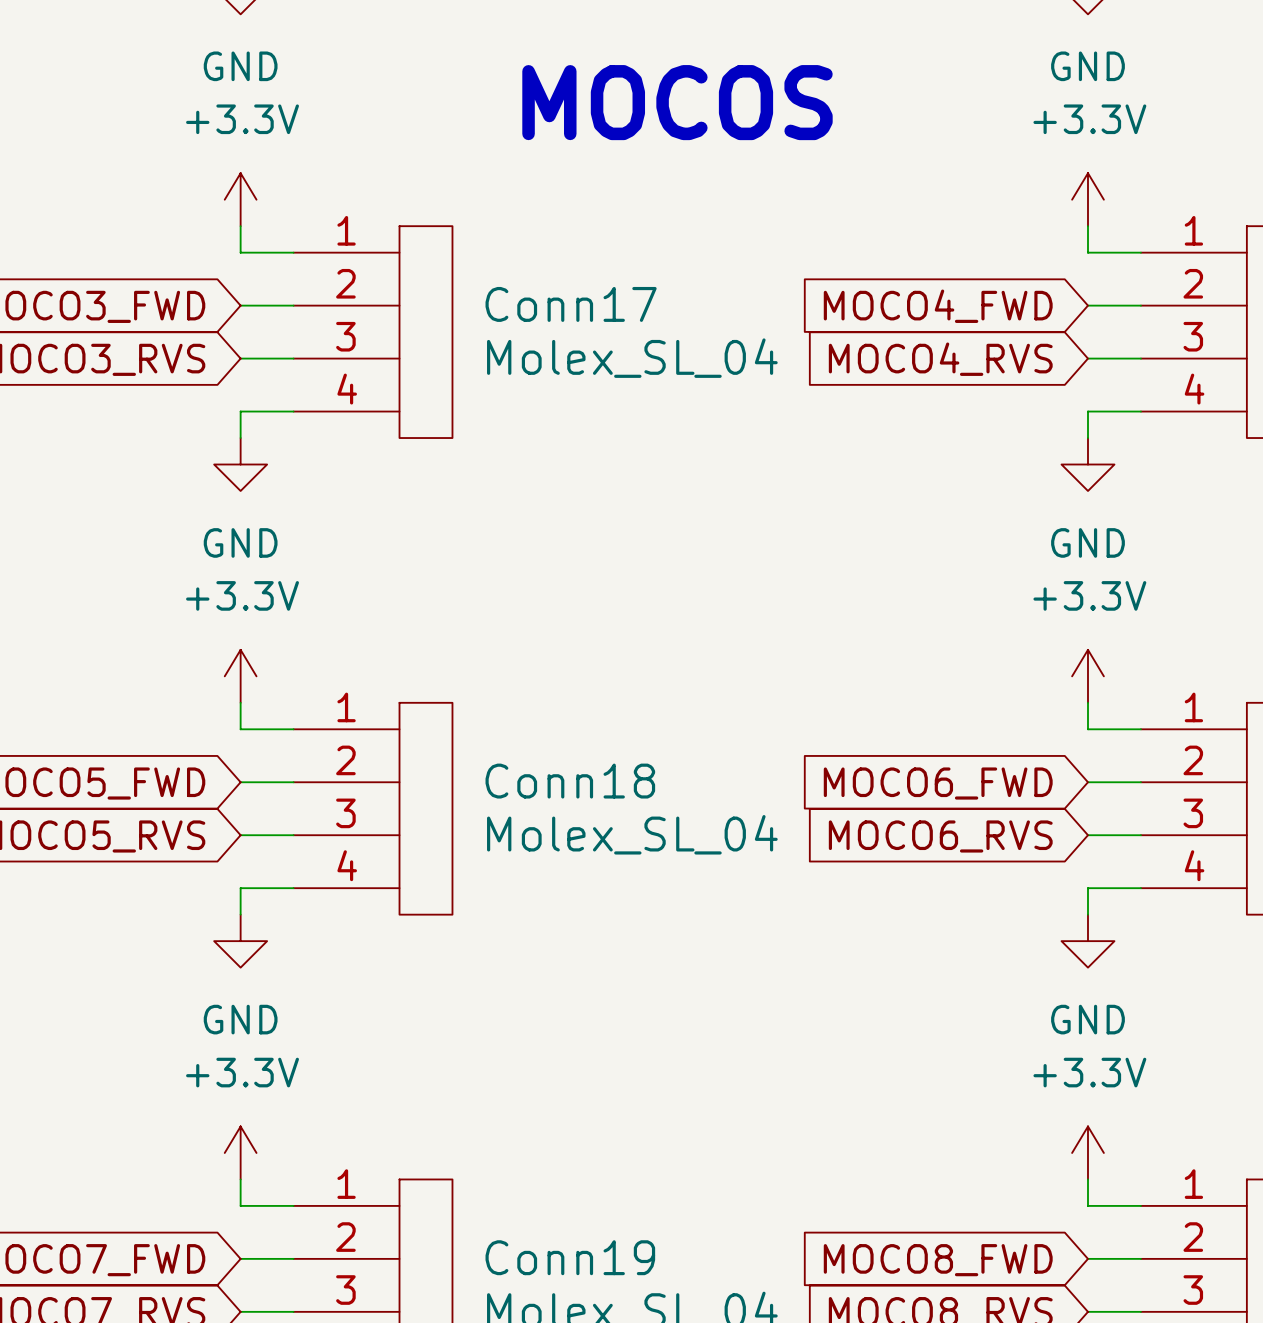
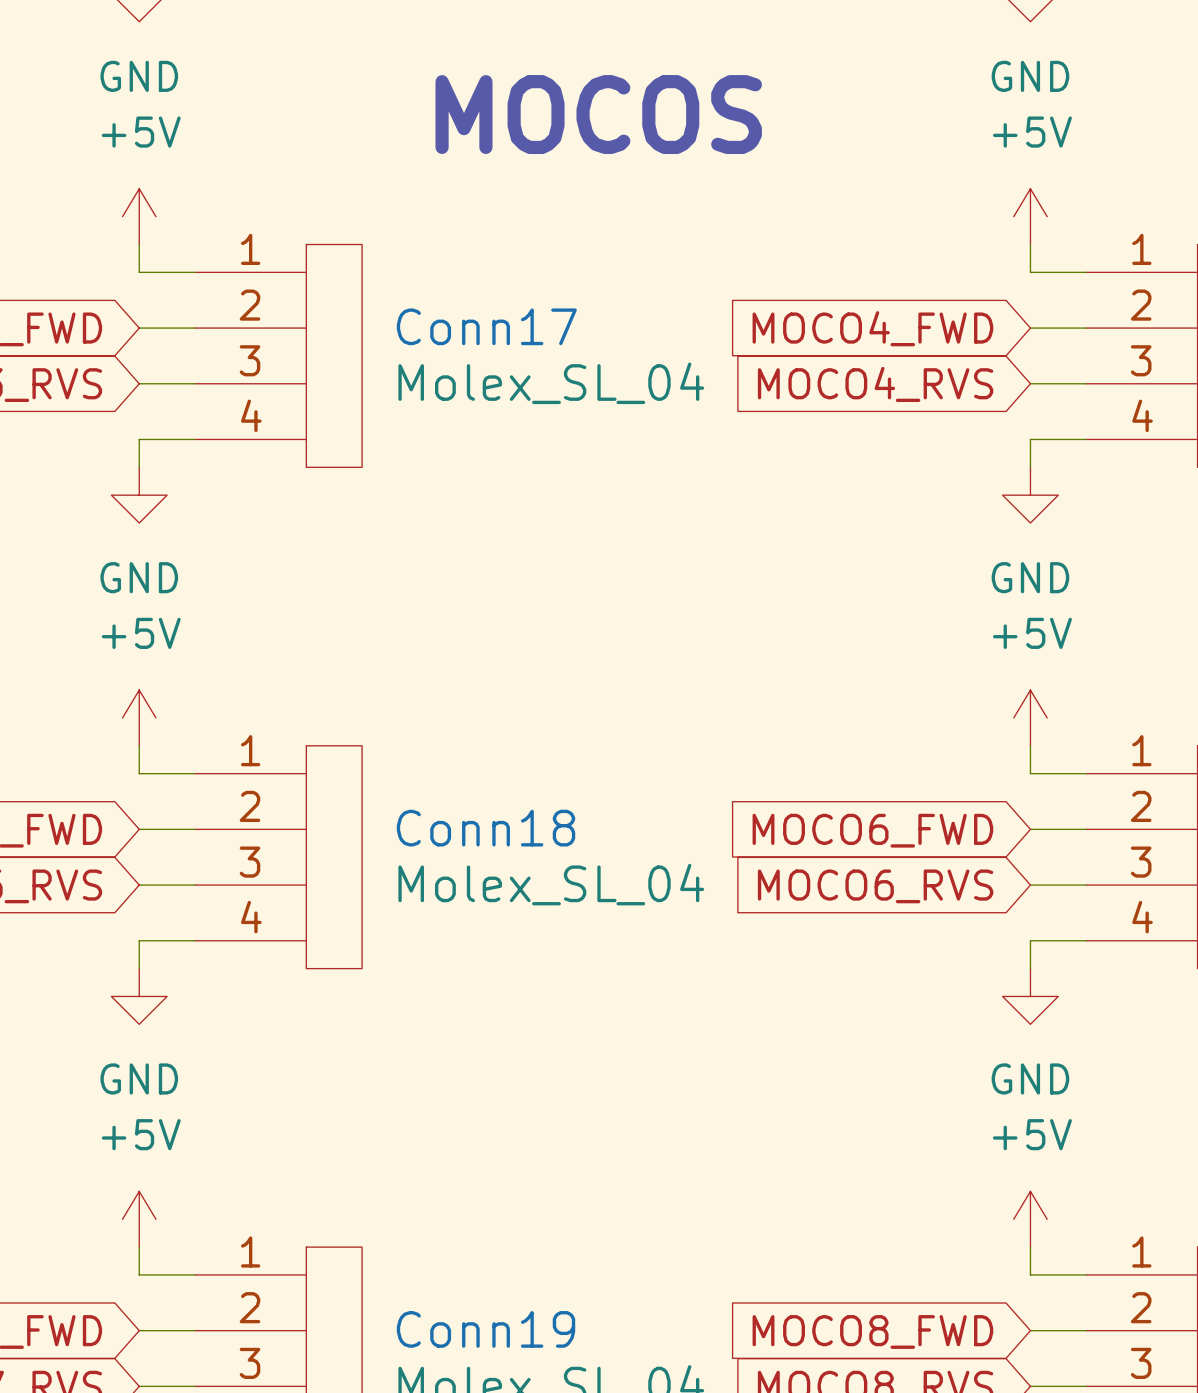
power symbol: +3.3V (240, 199) -> +5V (139, 216)
power symbol: +3.3V (1087, 199) -> +5V (1030, 216)
power symbol: +3.3V (240, 676) -> +5V (139, 717)
power symbol: +3.3V (1087, 676) -> +5V (1030, 717)
power symbol: +3.3V (240, 1152) -> +5V (139, 1219)
power symbol: +3.3V (1087, 1152) -> +5V (1030, 1219)

